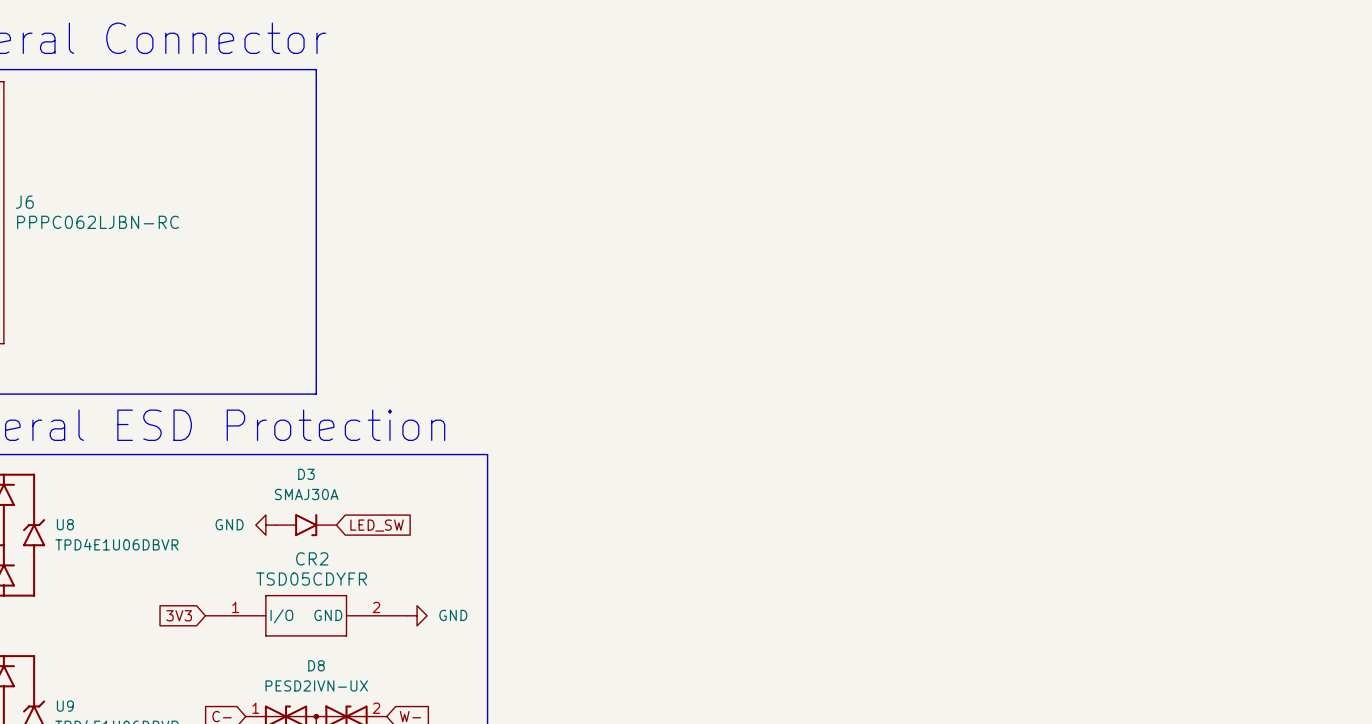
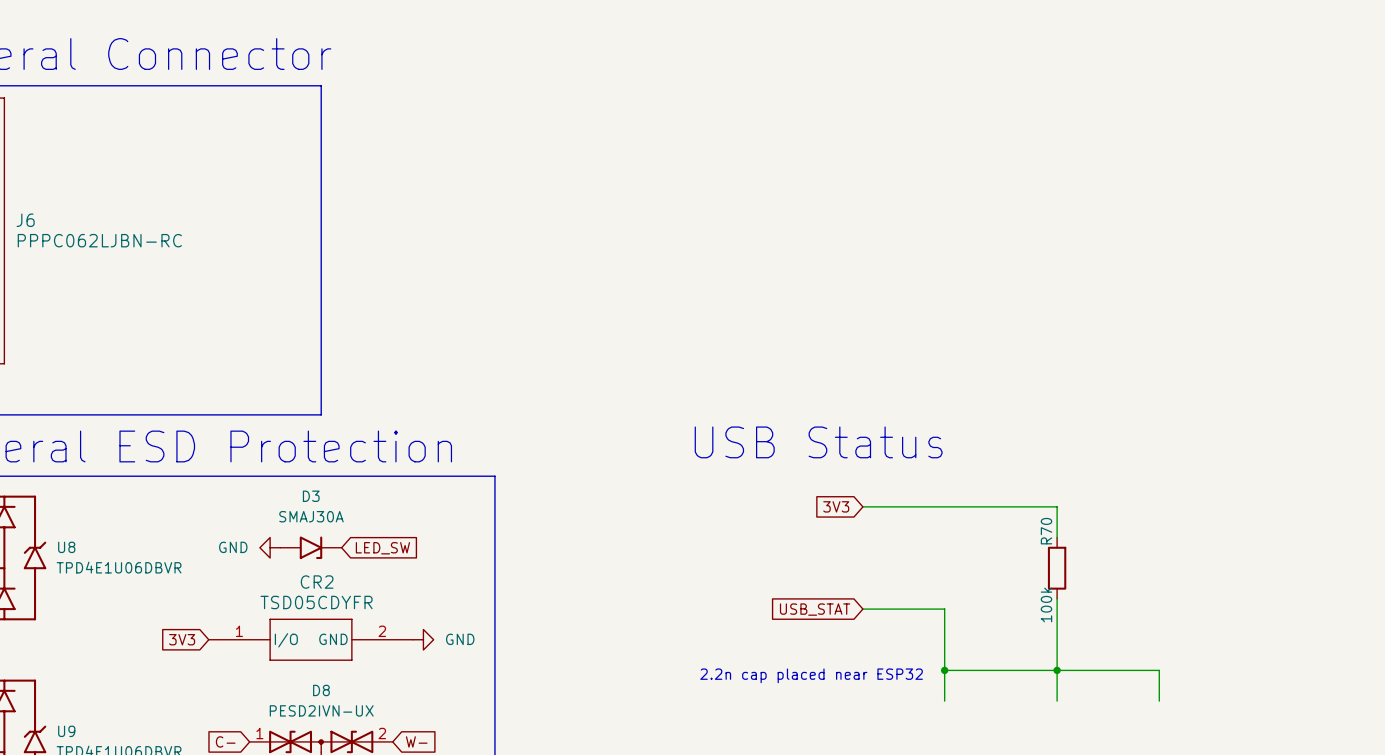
text: none -> USB Status (818, 442)
global label: none -> 3V3 (836, 506)
wire: none -> (862, 506) (1057, 506) (1057, 537)
R70: none -> 100k (1057, 568)
wire: none -> (1057, 598) (1057, 701)
wire: none -> (862, 609) (944, 609) (944, 701)
global label: none -> USB_STAT (815, 609)
wire: none -> (944, 670) (1159, 670) (1159, 701)
junction: none -> (944, 670)
junction: none -> (1057, 670)
text: none -> 2.2n cap placed near ESP32 (811, 675)

